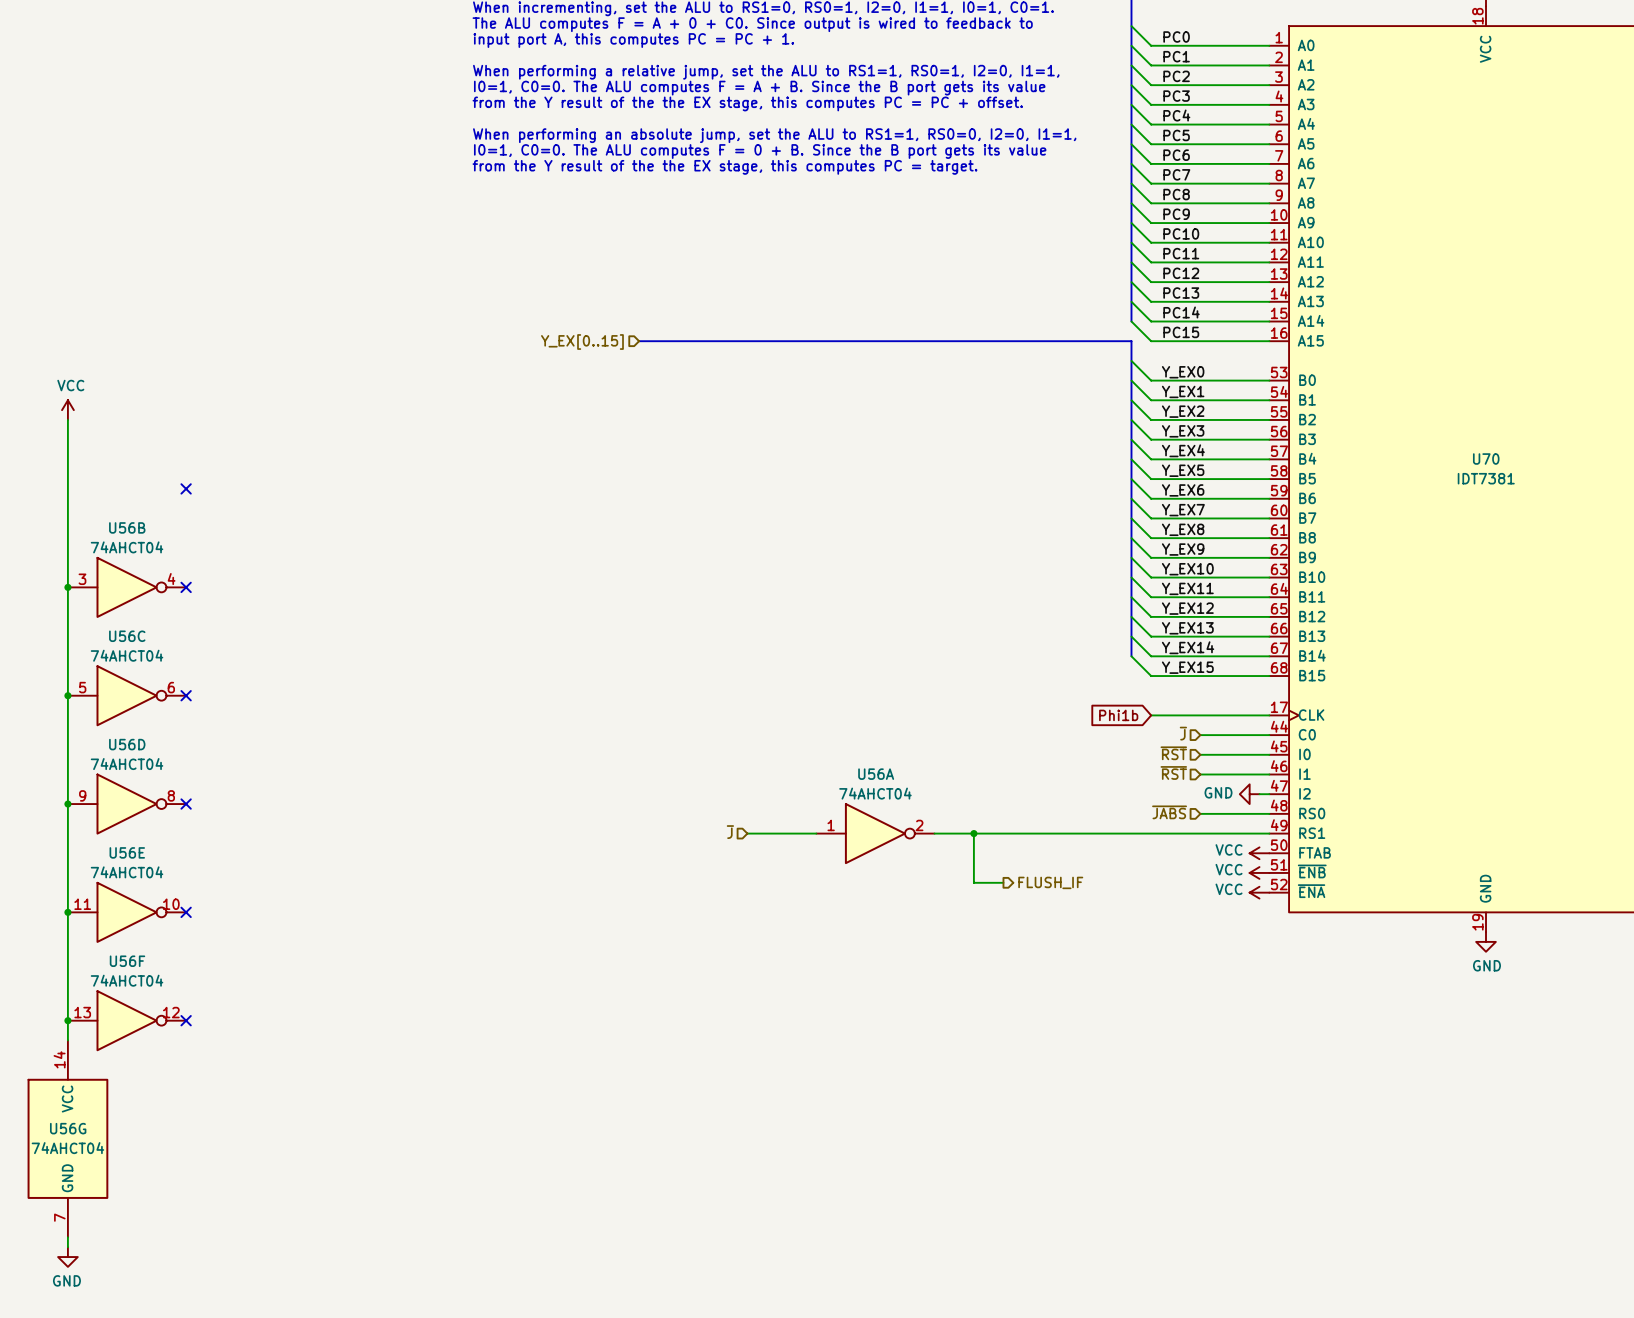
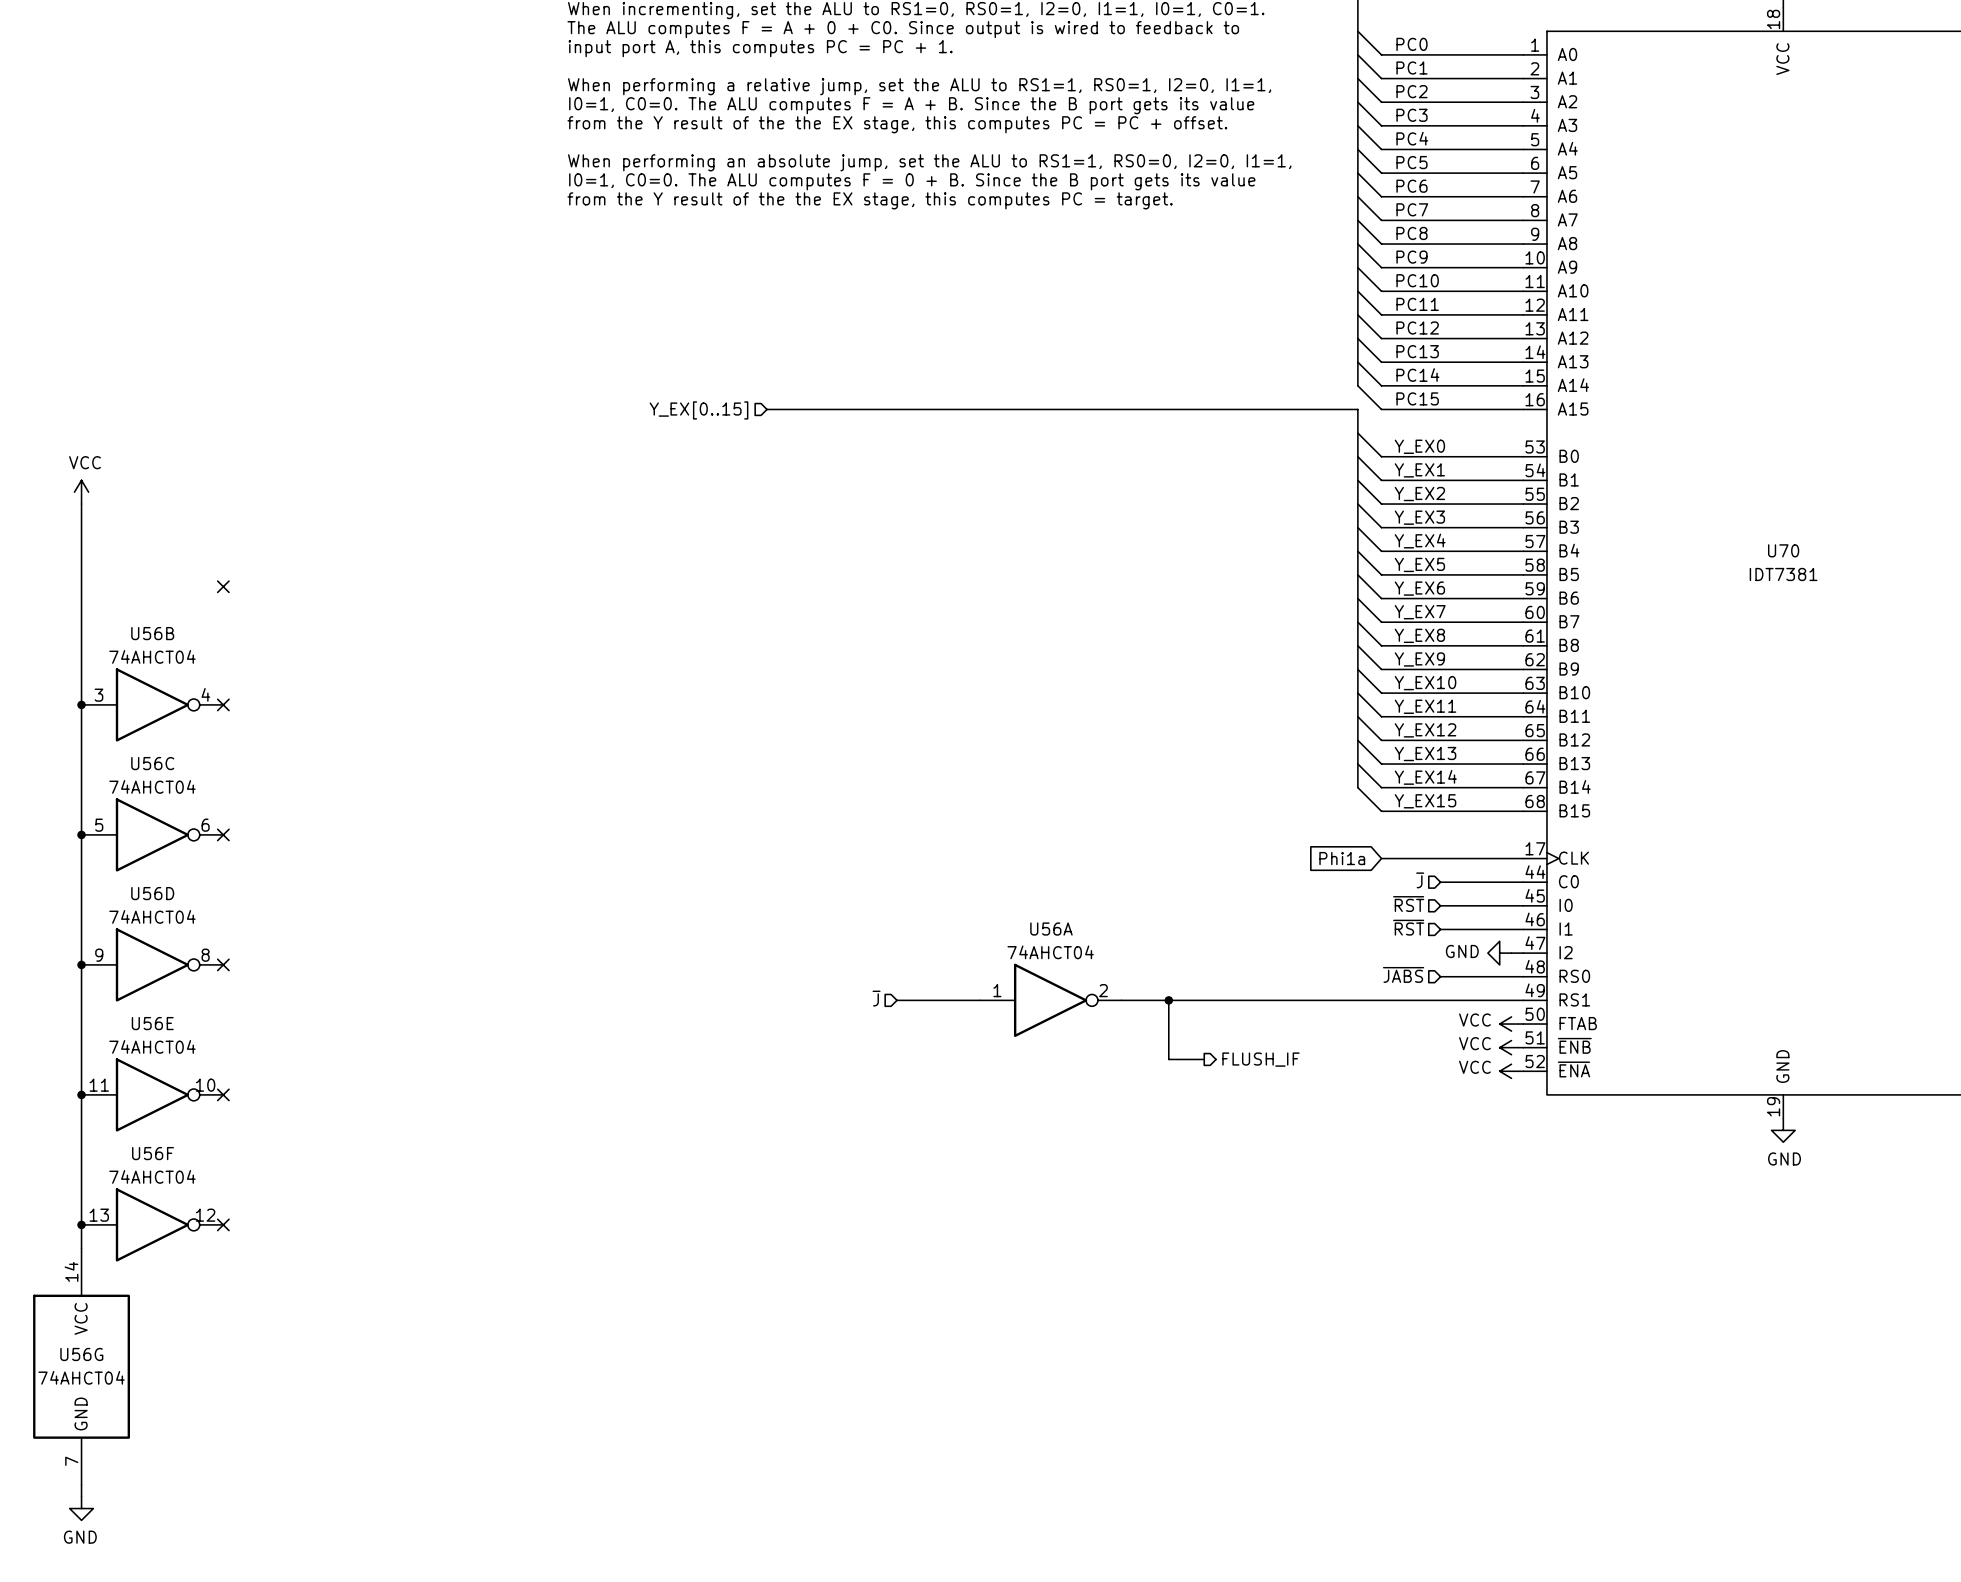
global label: Phi1b (1118, 715) -> Phi1a (1342, 858)

